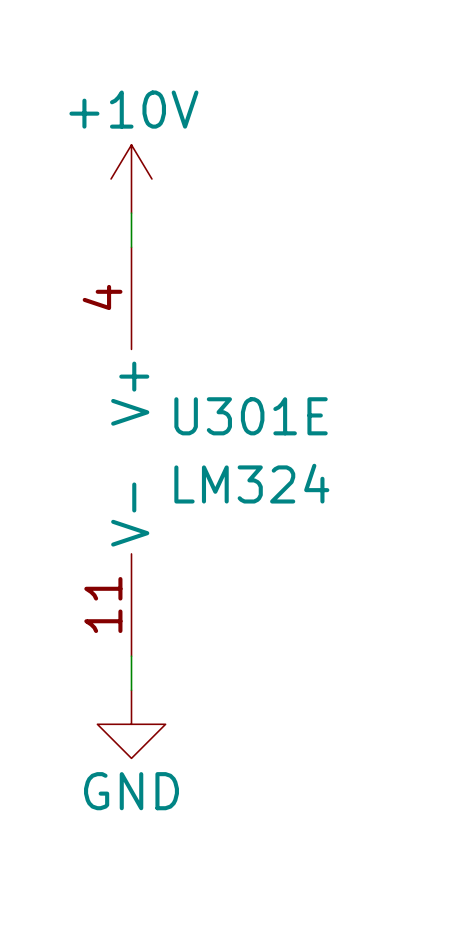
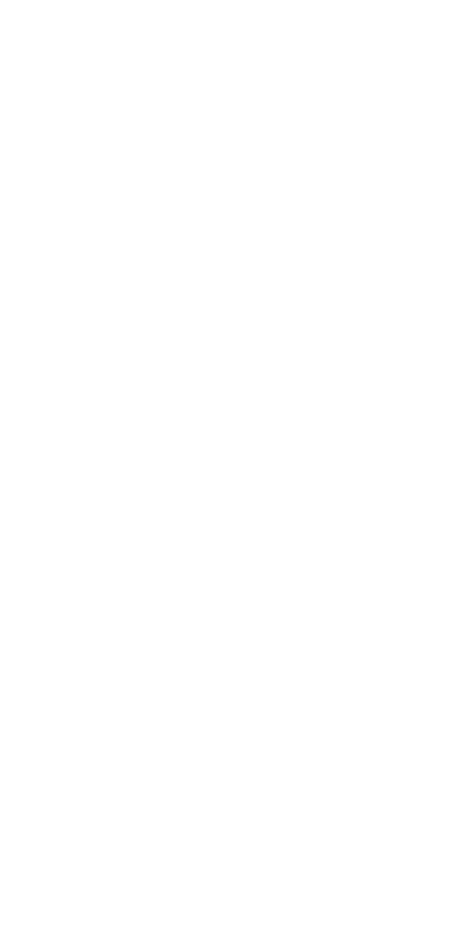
power symbol: +10V (131, 179) -> none
wire: (131, 213) (131, 247) -> none
U301E: LM324 (131, 451) -> none
wire: (131, 656) (131, 690) -> none
power symbol: GND (131, 724) -> none

